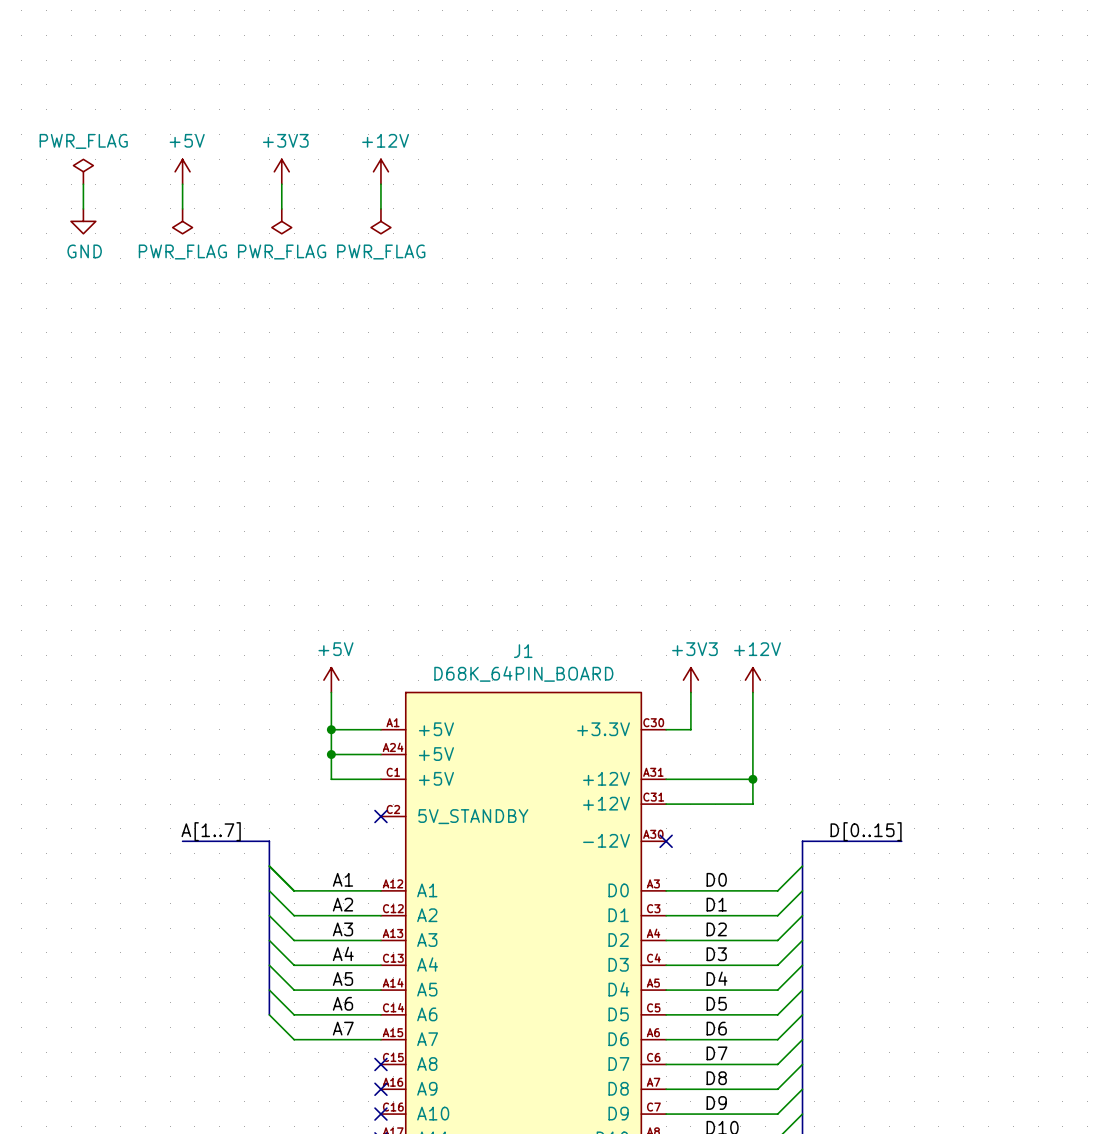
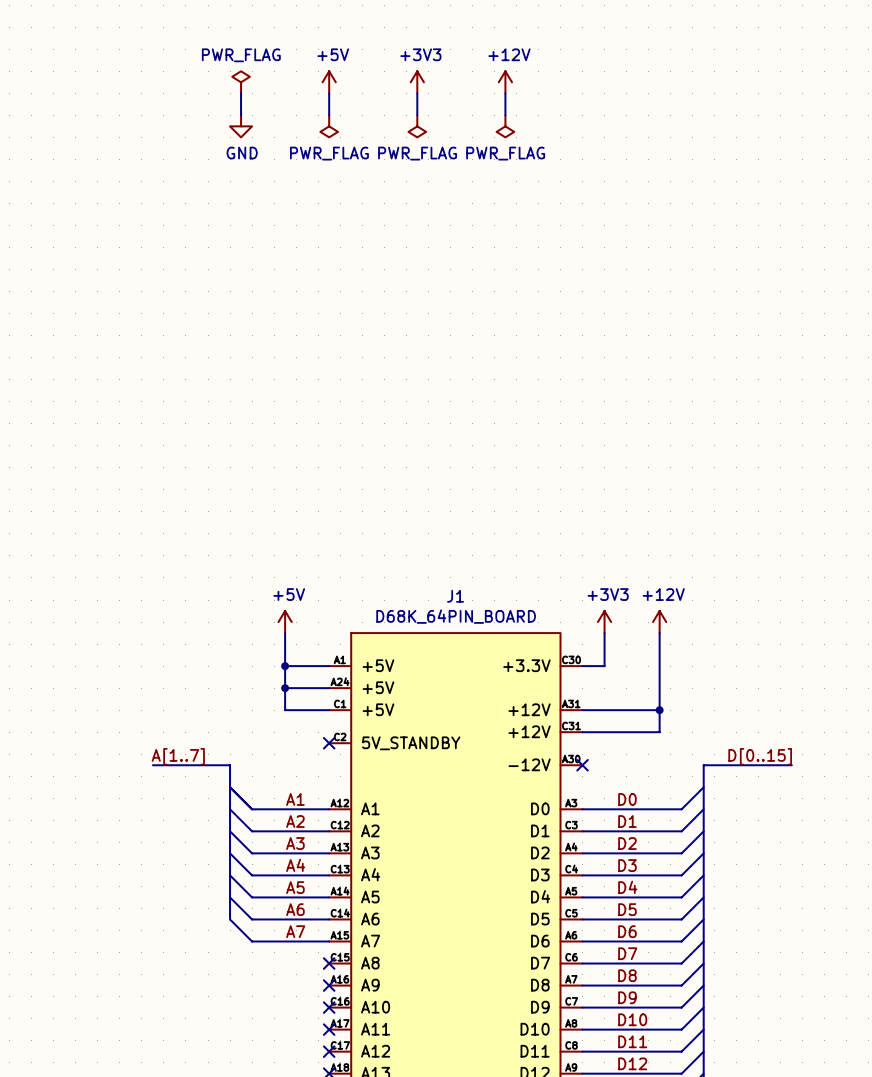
power symbol: none -> PWR_FLAG (241, 82)
power symbol: none -> PWR_FLAG (329, 126)
power symbol: none -> PWR_FLAG (417, 126)
power symbol: none -> PWR_FLAG (505, 126)
power symbol: PWR_FLAG (83, 171) -> none
power symbol position: +5V (182, 171) -> +5V (329, 82)
power symbol position: +3V3 (281, 171) -> +3V3 (417, 82)
power symbol position: +12V (380, 171) -> +12V (505, 82)
wire: (83, 184) (83, 208) -> (241, 93) (241, 115)
wire: (182, 184) (182, 208) -> (329, 93) (329, 115)
wire: (281, 184) (281, 208) -> (417, 93) (417, 115)
wire: (380, 184) (380, 208) -> (505, 93) (505, 115)
power symbol position: GND (83, 221) -> GND (241, 126)
power symbol: PWR_FLAG (182, 221) -> none
power symbol: PWR_FLAG (281, 221) -> none
power symbol: PWR_FLAG (380, 221) -> none

